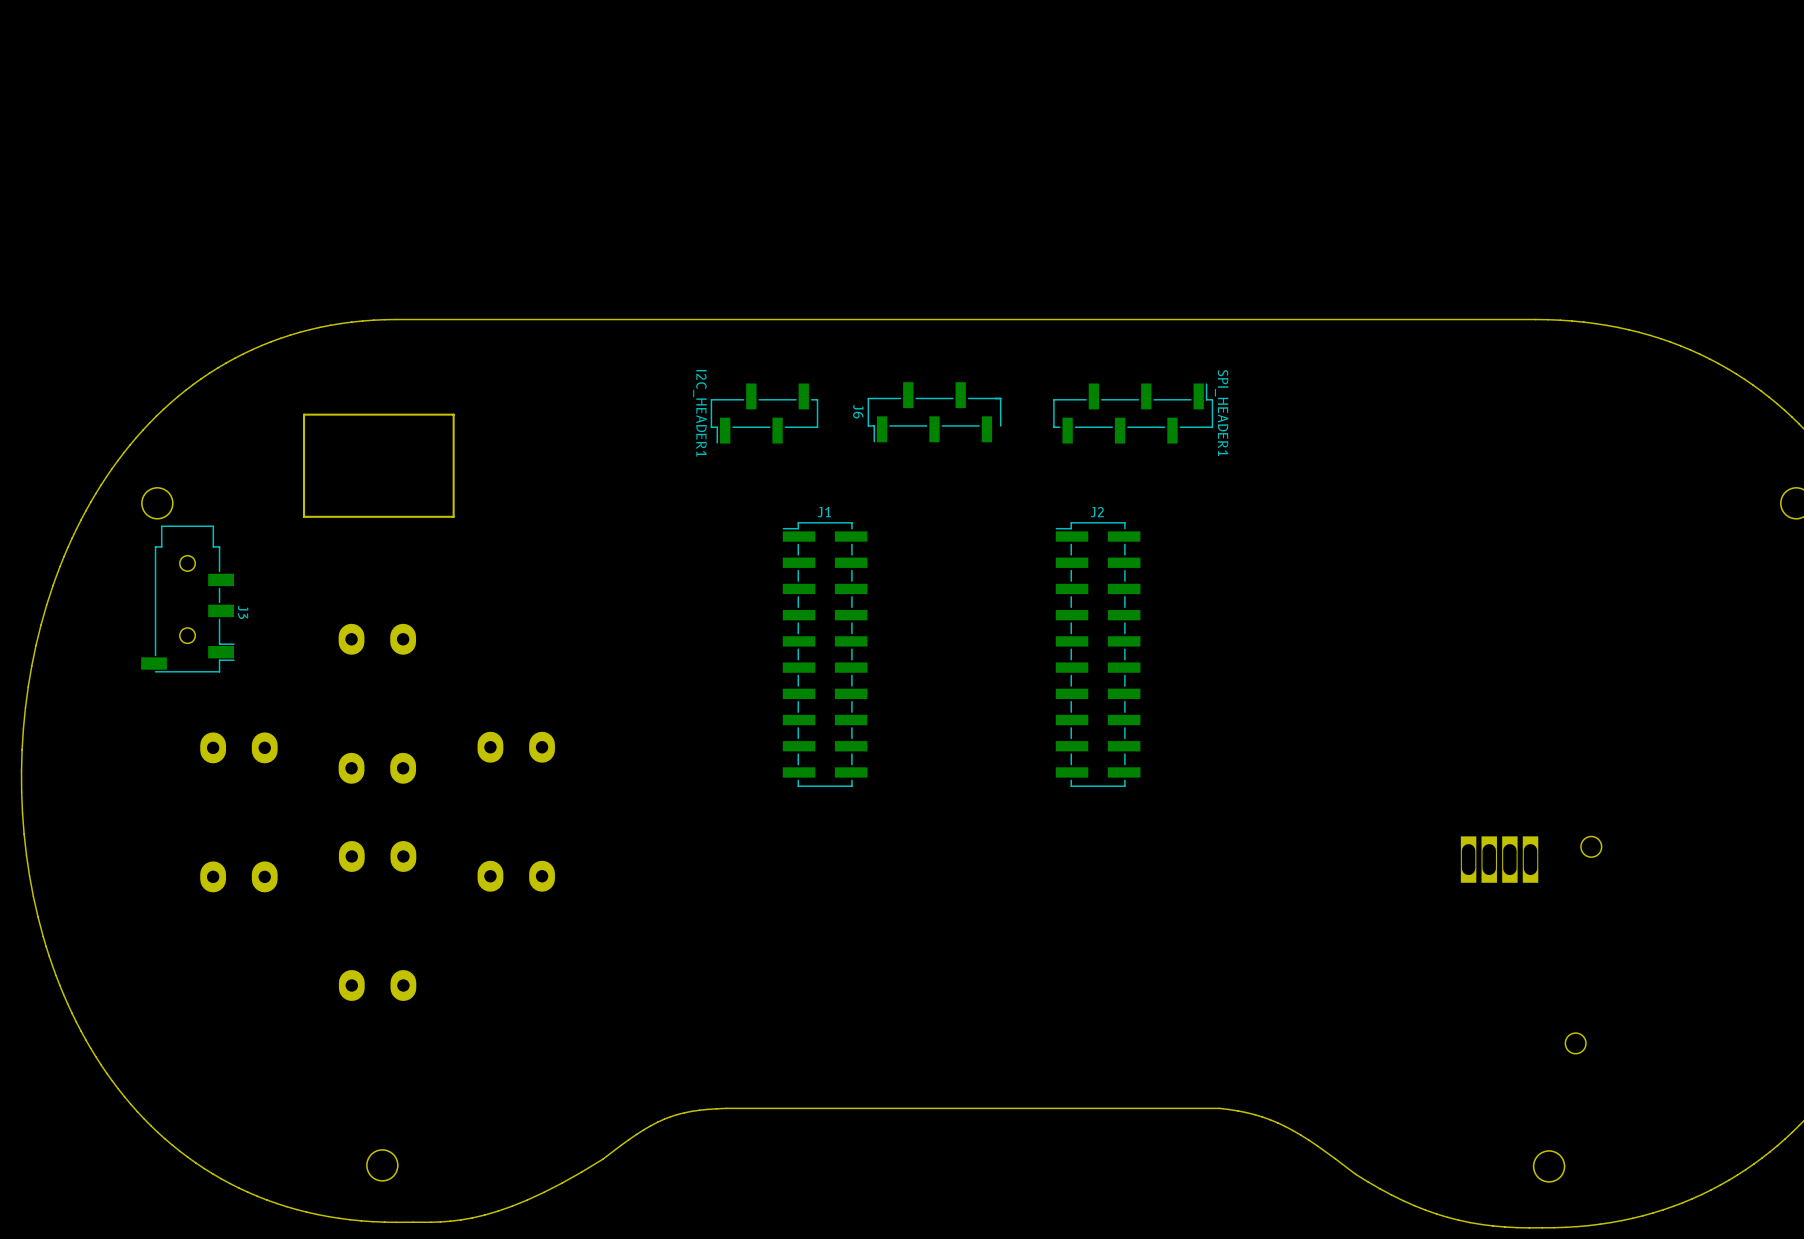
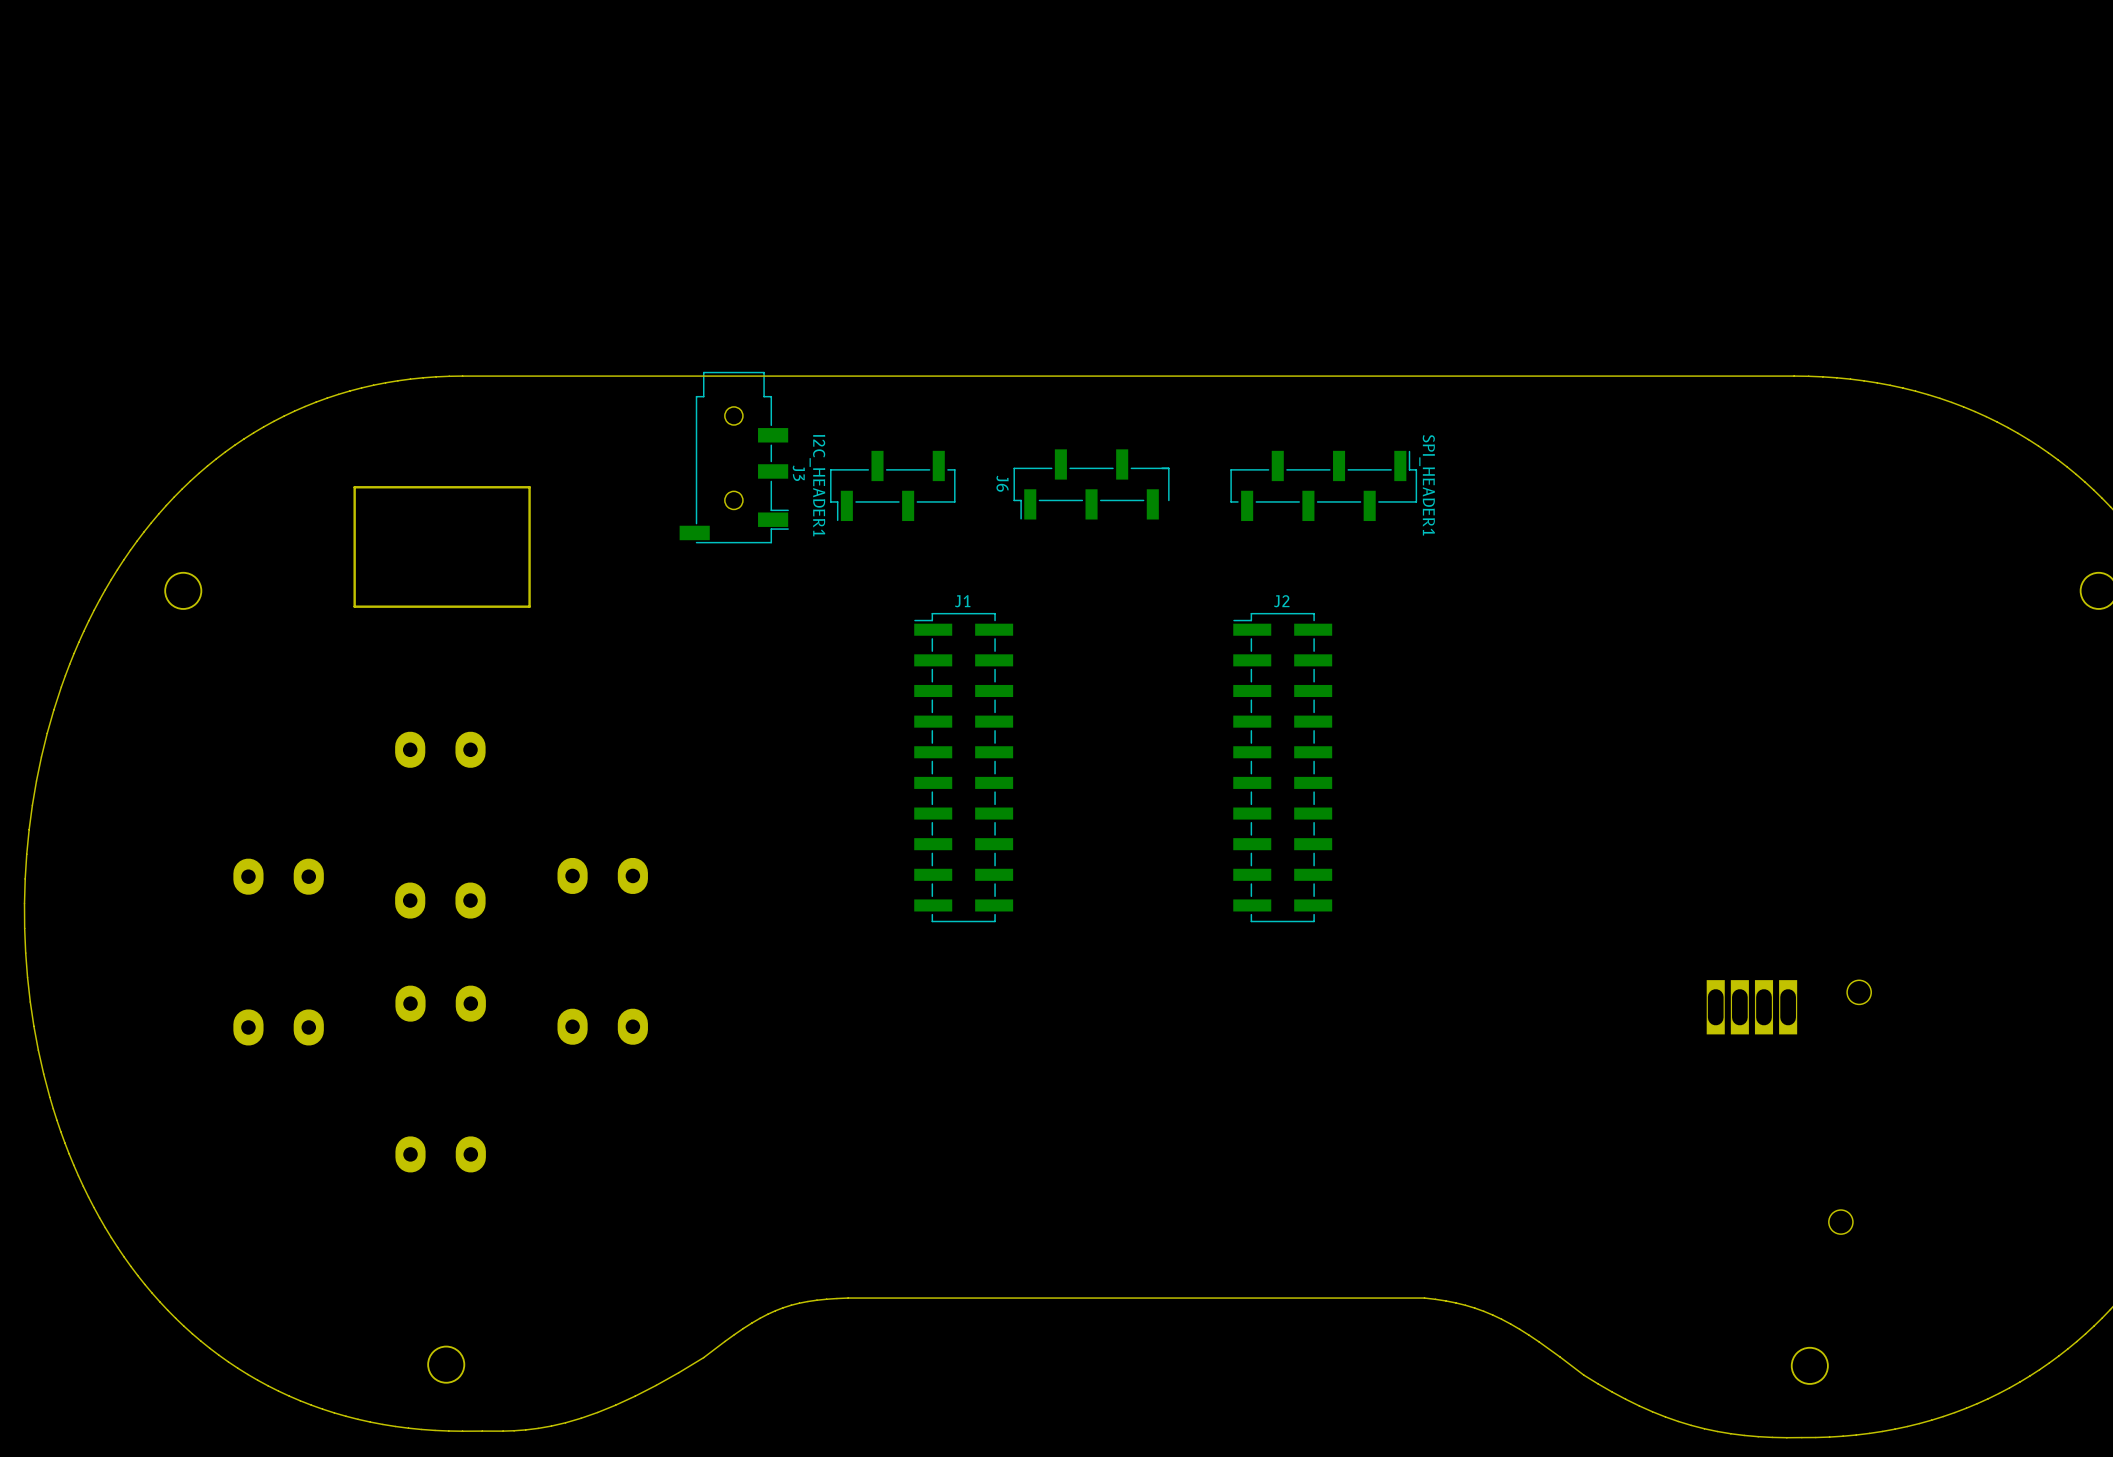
J3 position: (187, 599) -> (734, 457)

